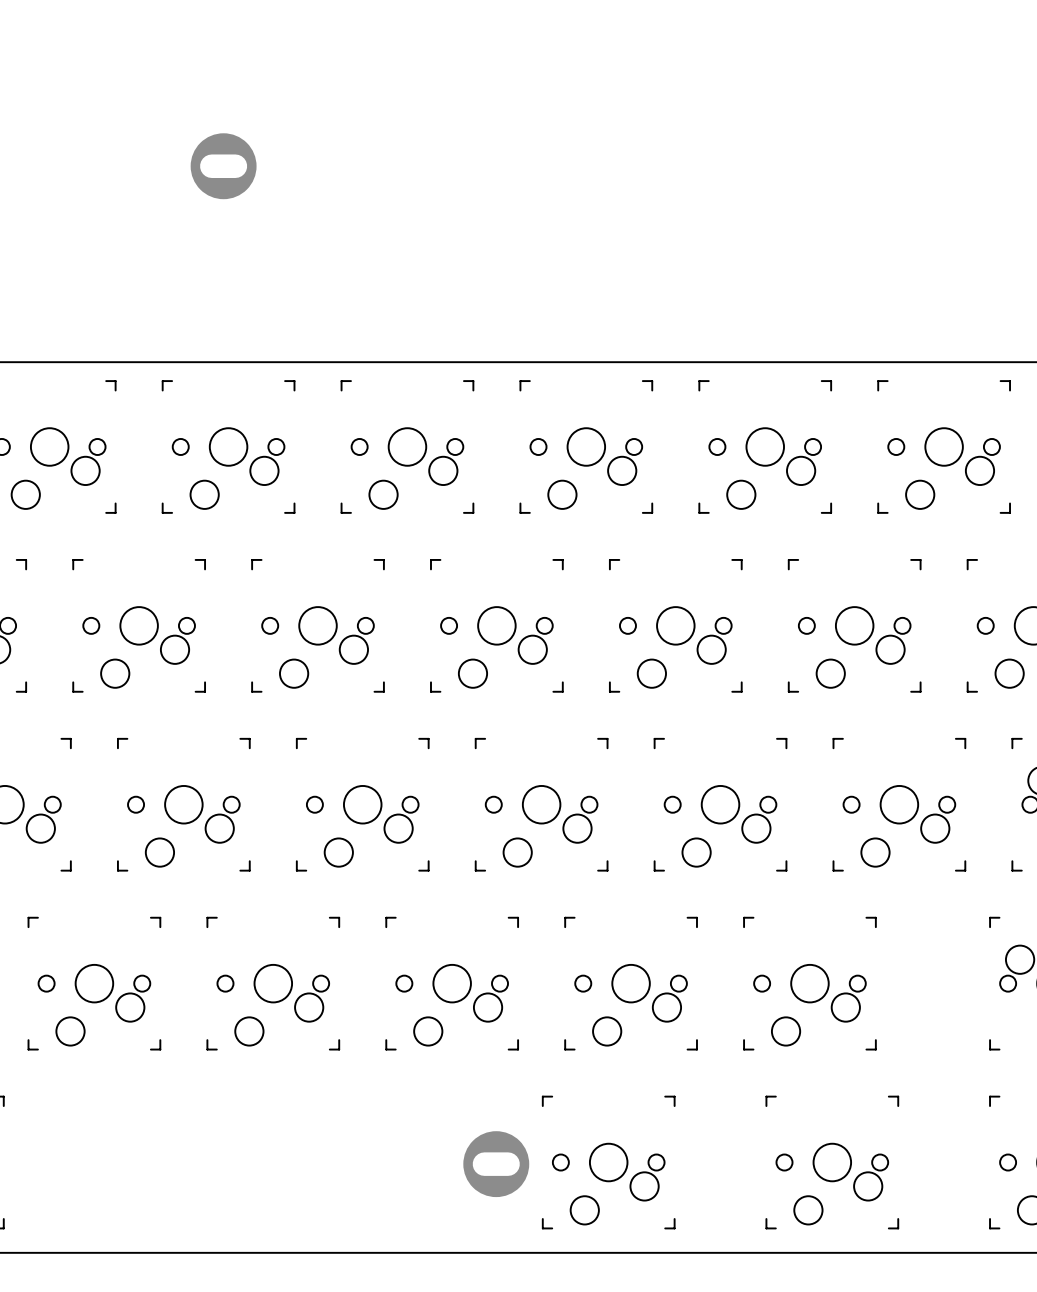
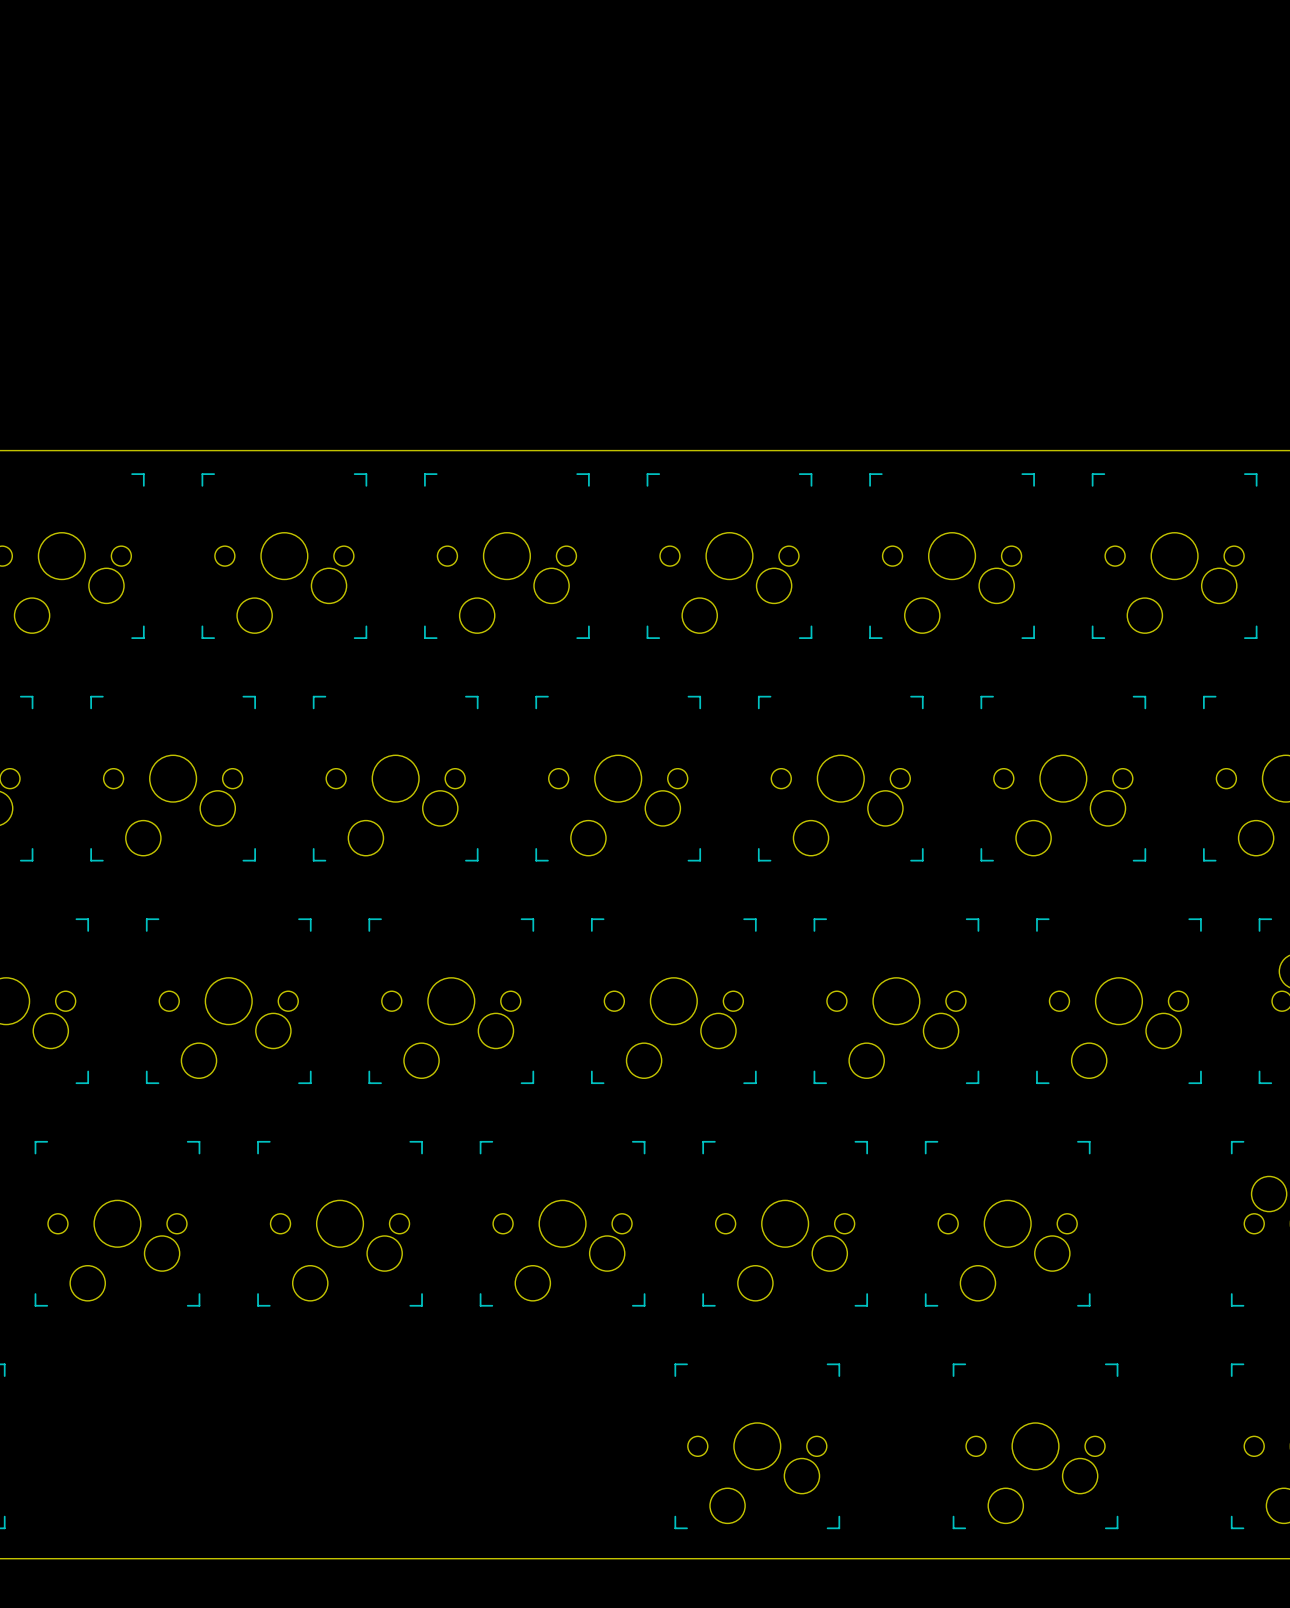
part: (223, 166) -> none
part: (496, 1164) -> none

